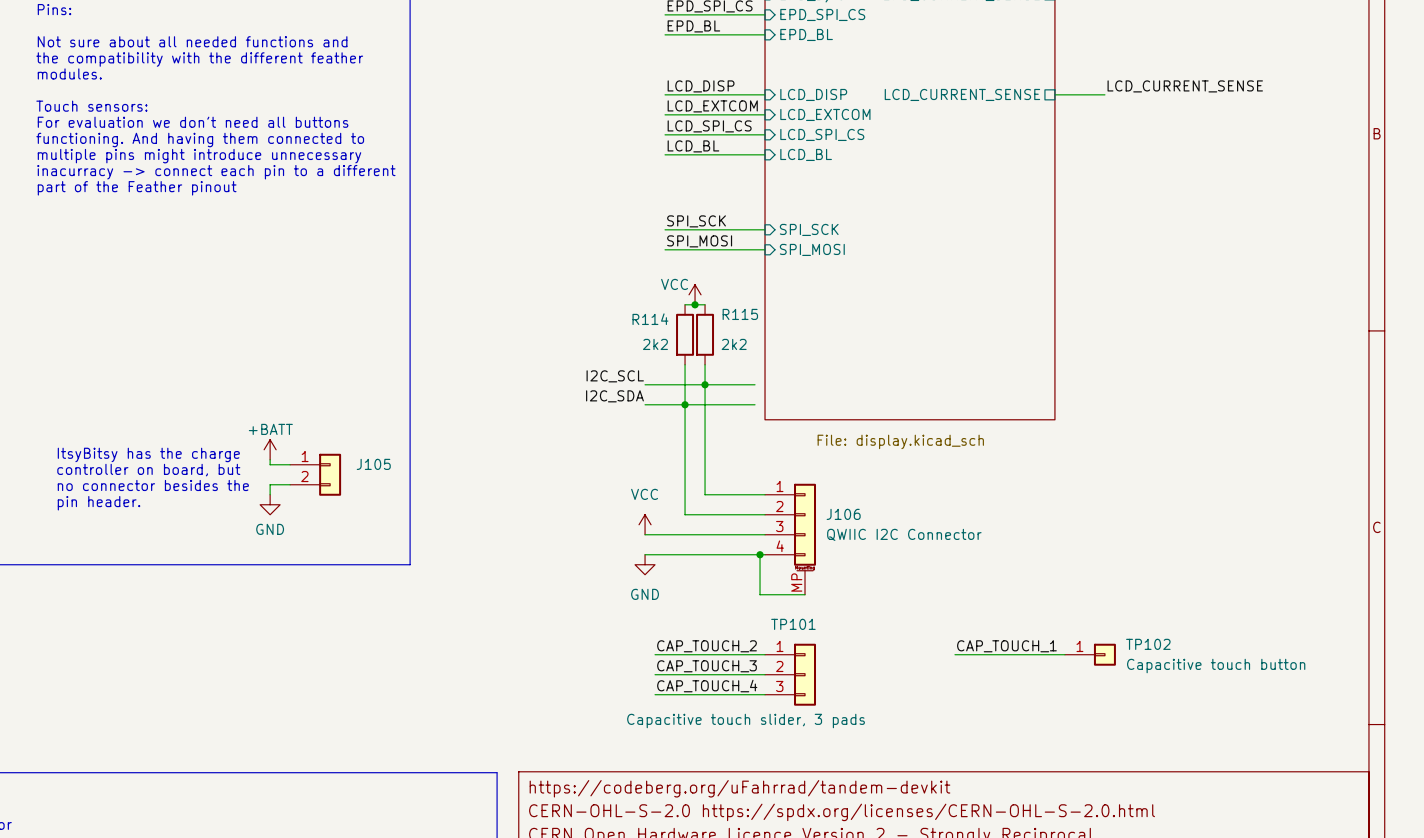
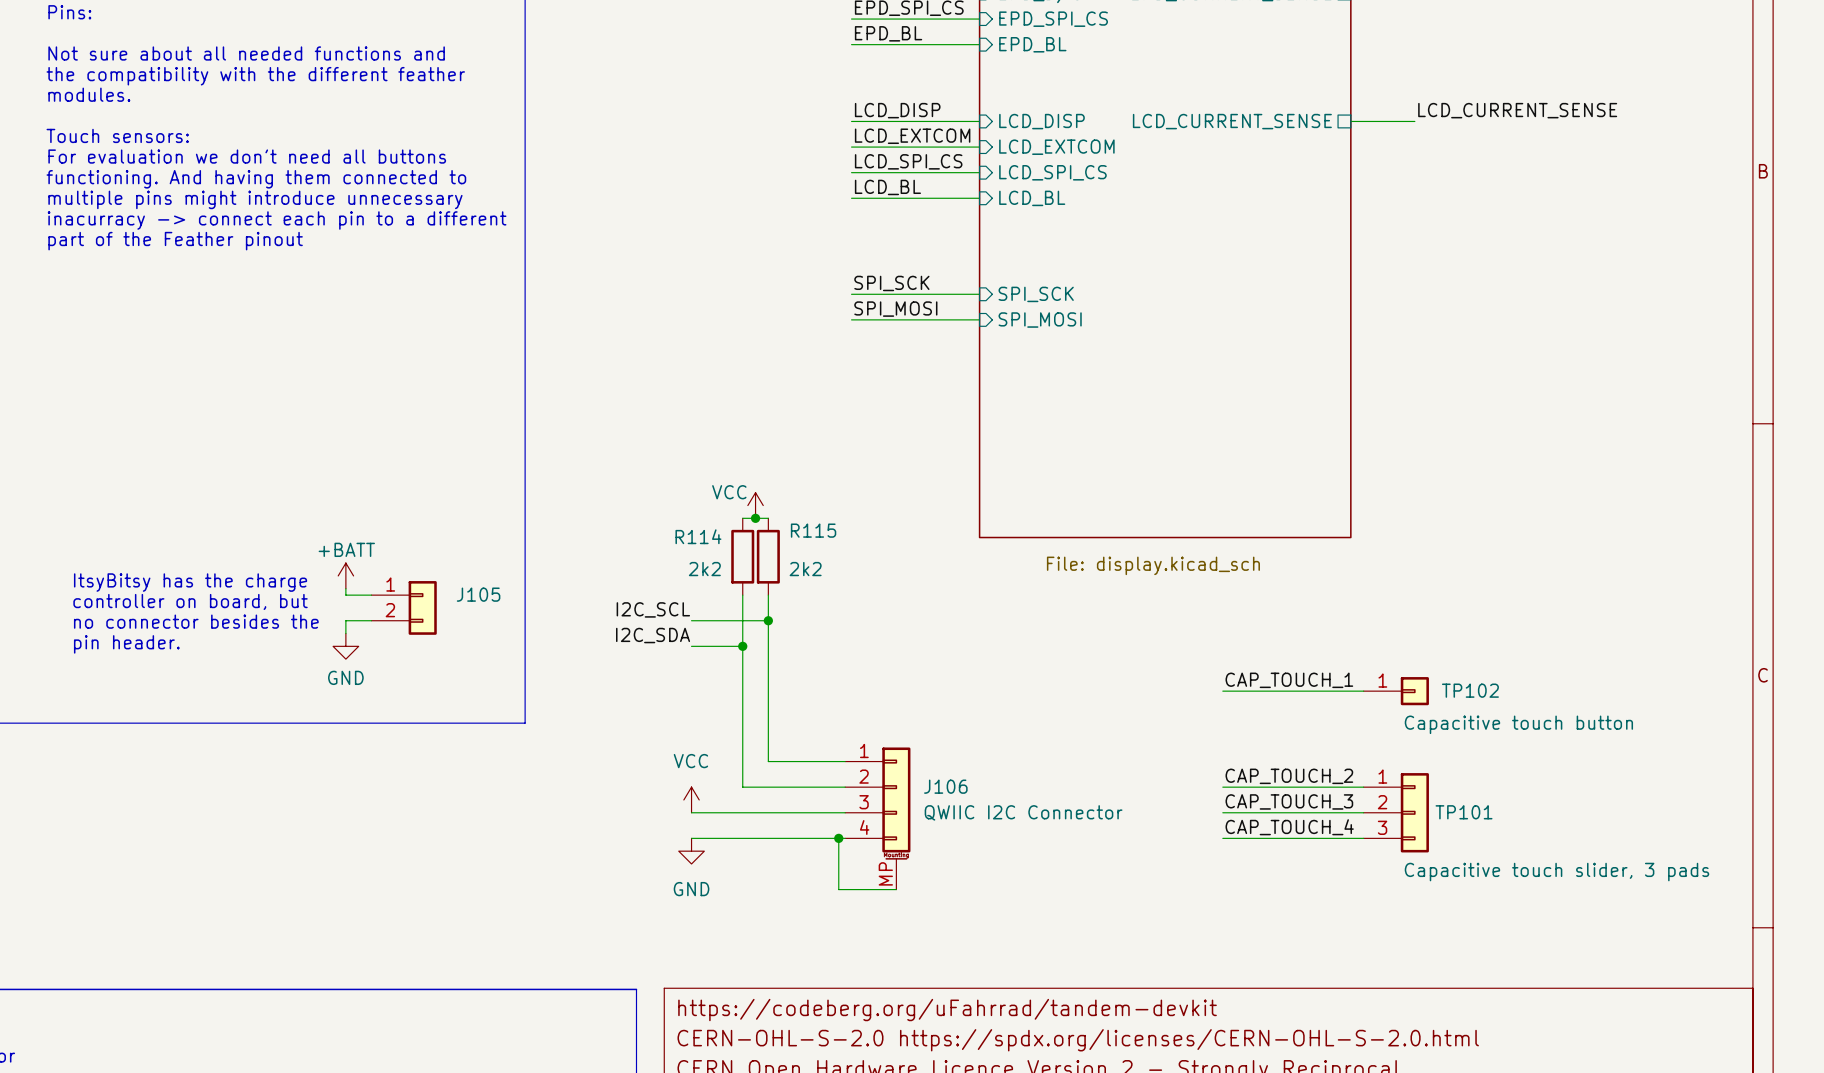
power symbol: VCC (695, 294) -> none
wire: (685, 304) (705, 304) -> (742, 518) (768, 518)
junction: (695, 304) -> none
R114 position: (685, 334) -> (742, 556)
R115 position: (705, 334) -> (768, 556)
wire: (685, 364) (685, 514) (765, 514) -> (742, 595) (742, 787) (845, 787)
wire: (705, 364) (705, 494) (765, 494) -> (768, 595) (768, 761) (845, 761)
label position: I2C_SCL (615, 376) -> I2C_SCL (653, 609)
wire: (645, 384) (755, 384) -> none
junction: (705, 384) -> none
power symbol: none -> VCC (755, 505)
label position: I2C_SDA (614, 396) -> I2C_SDA (653, 635)
junction: none -> (755, 518)
wire: (645, 404) (755, 404) -> none
junction: (685, 404) -> none
wire: none -> (691, 620) (768, 620)
junction: none -> (768, 620)
wire: none -> (691, 646) (742, 646)
junction: none -> (742, 646)
power symbol: VCC (645, 524) -> none
label: none -> CAP_TOUCH_1 (1289, 680)
wire: (645, 534) (765, 534) -> (691, 812) (845, 812)
J106 position: (790, 539) -> (877, 818)
wire: none -> (1222, 691) (1363, 691)
wire: (645, 554) (765, 554) -> none
wire: (760, 554) (760, 594) (805, 594) -> none
junction: (760, 554) -> none
power symbol position: GND (645, 564) -> GND (691, 851)
label: none -> CAP_TOUCH_2 (1289, 776)
wire: none -> (1222, 787) (1363, 787)
power symbol: none -> VCC (691, 799)
TP101 name position: TP101 (793, 624) -> TP101 (1464, 812)
label: none -> CAP_TOUCH_3 (1289, 801)
wire: none -> (1222, 812) (1363, 812)
TP102 name position: TP102 (1148, 644) -> TP102 (1470, 690)
label: CAP_TOUCH_2 (707, 646) -> none
label: CAP_TOUCH_1 (1006, 646) -> CAP_TOUCH_4 (1289, 827)
wire: none -> (691, 838) (838, 838) (838, 889)
junction: none -> (838, 838)
wire: (660, 654) (765, 654) -> none
TP102 position: (1090, 654) -> (1396, 691)
label: CAP_TOUCH_3 (707, 666) -> none
TP102 value position: Capacitive touch button (1216, 666) -> Capacitive touch button (1518, 724)
wire: (655, 674) (765, 674) -> none
TP101 position: (790, 674) -> (1396, 812)
label: CAP_TOUCH_4 (707, 686) -> none
wire: (700, 694) (765, 694) -> none
TP101 value position: Capacitive touch slider, 3 pads (746, 721) -> Capacitive touch slider, 3 pads (1556, 872)

